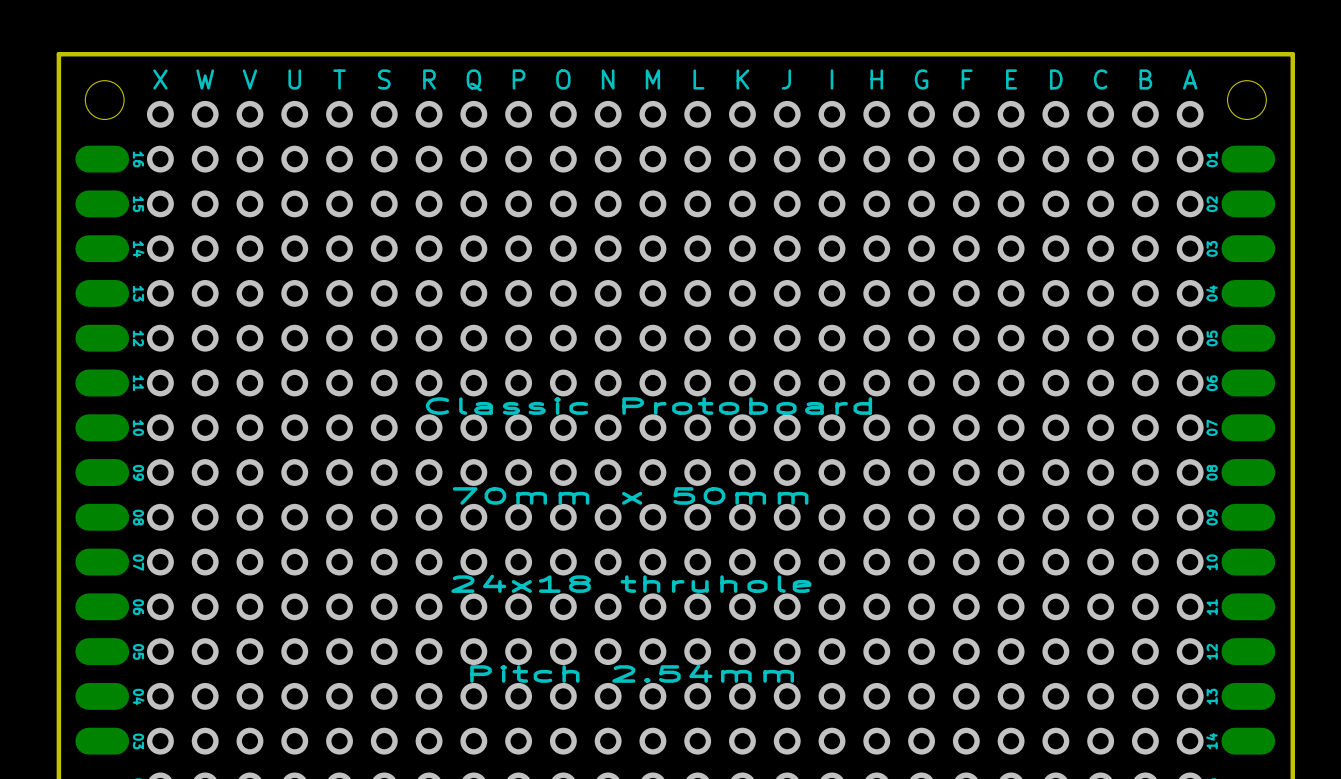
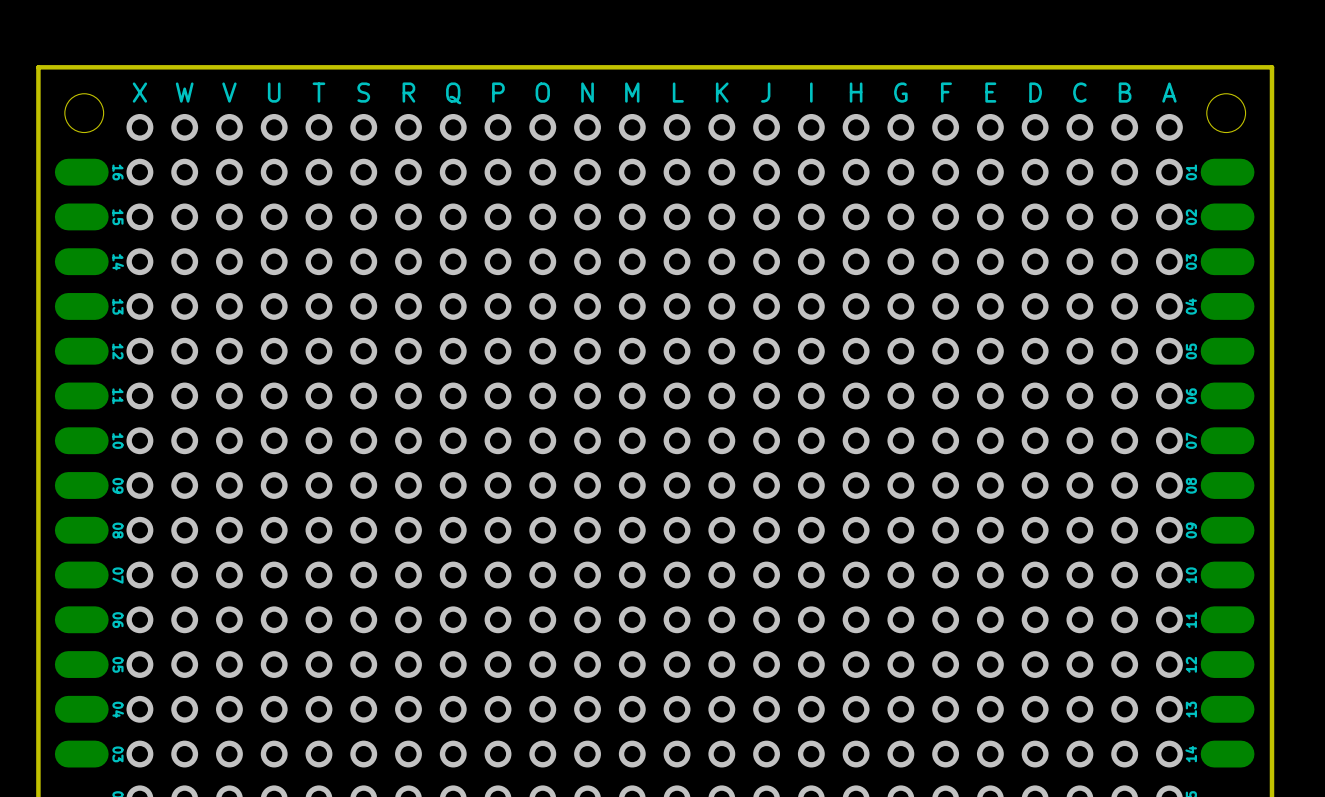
text: Classic Protoboard (648, 406) -> none
text: 70mm x 50mm (630, 495) -> none
text: 24x18 thruhole (631, 583) -> none
text: Pitch 2.54mm (632, 673) -> none

